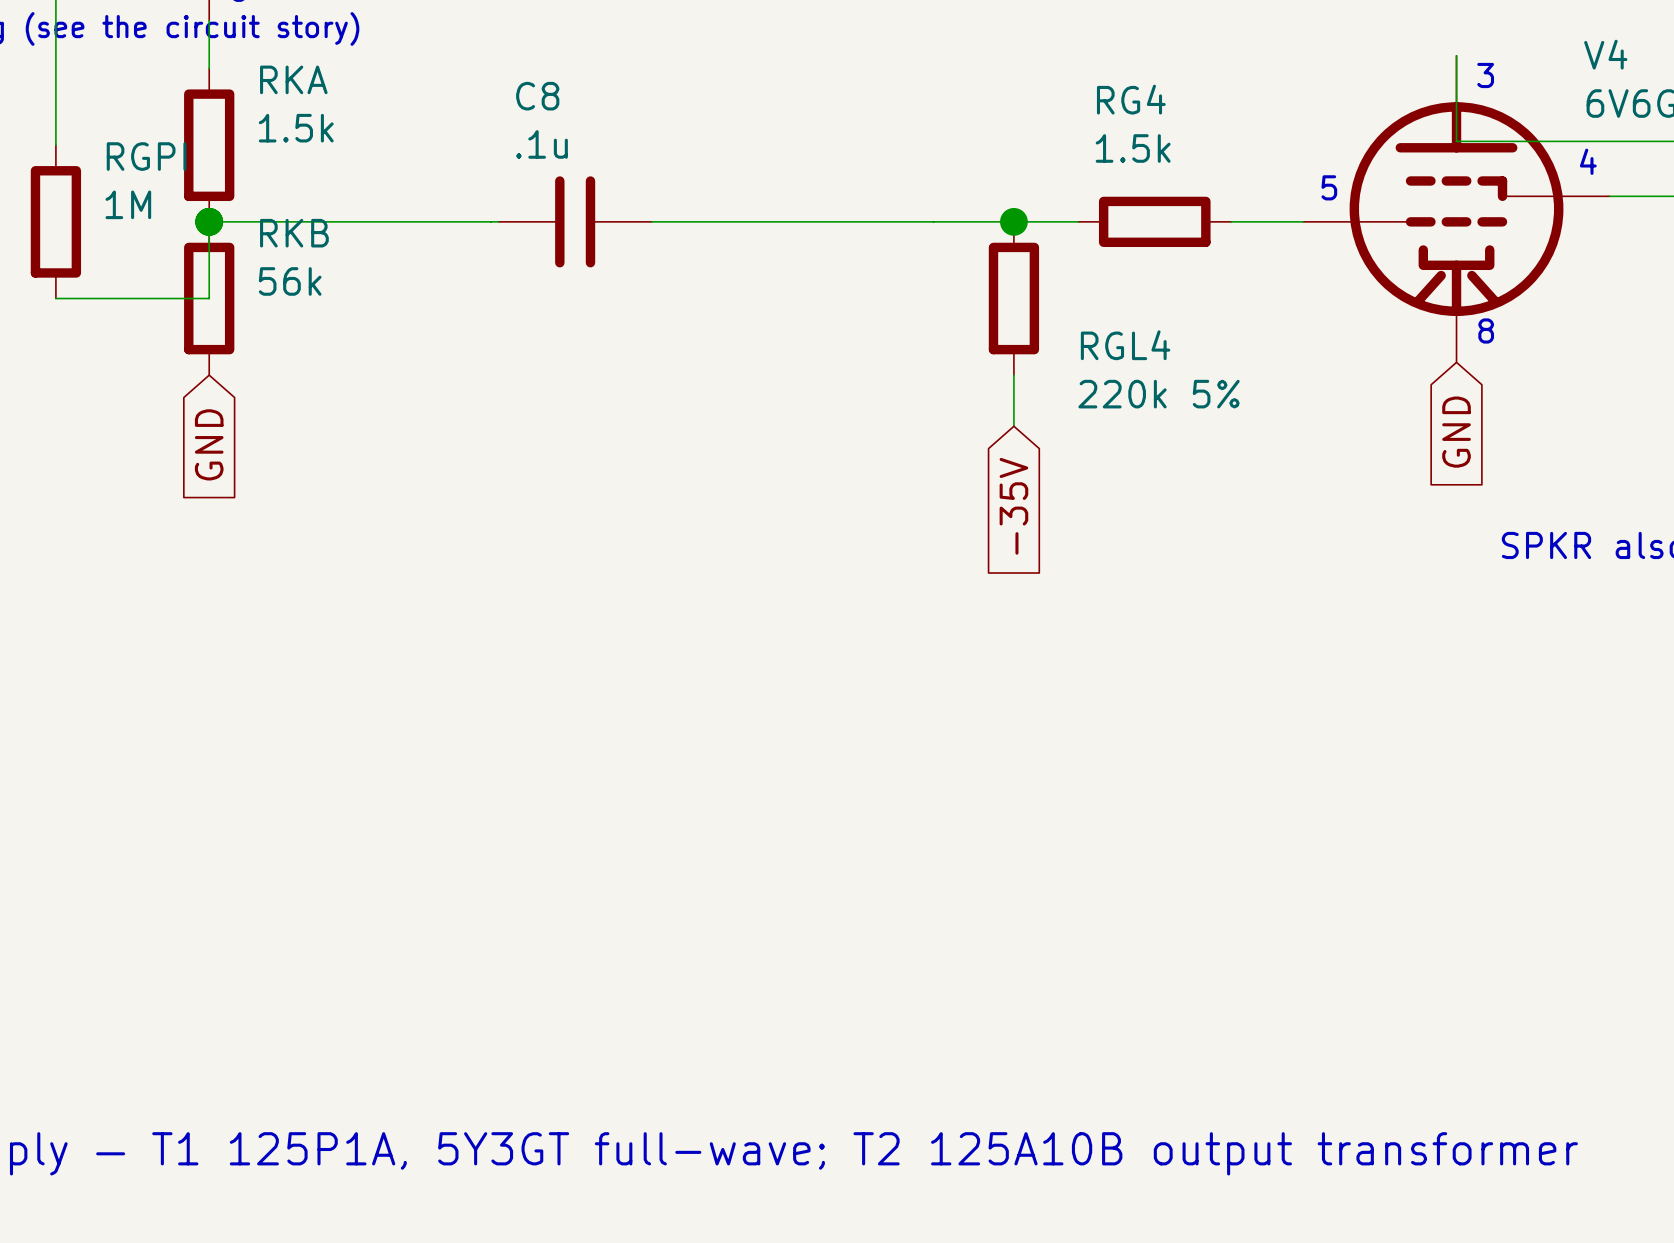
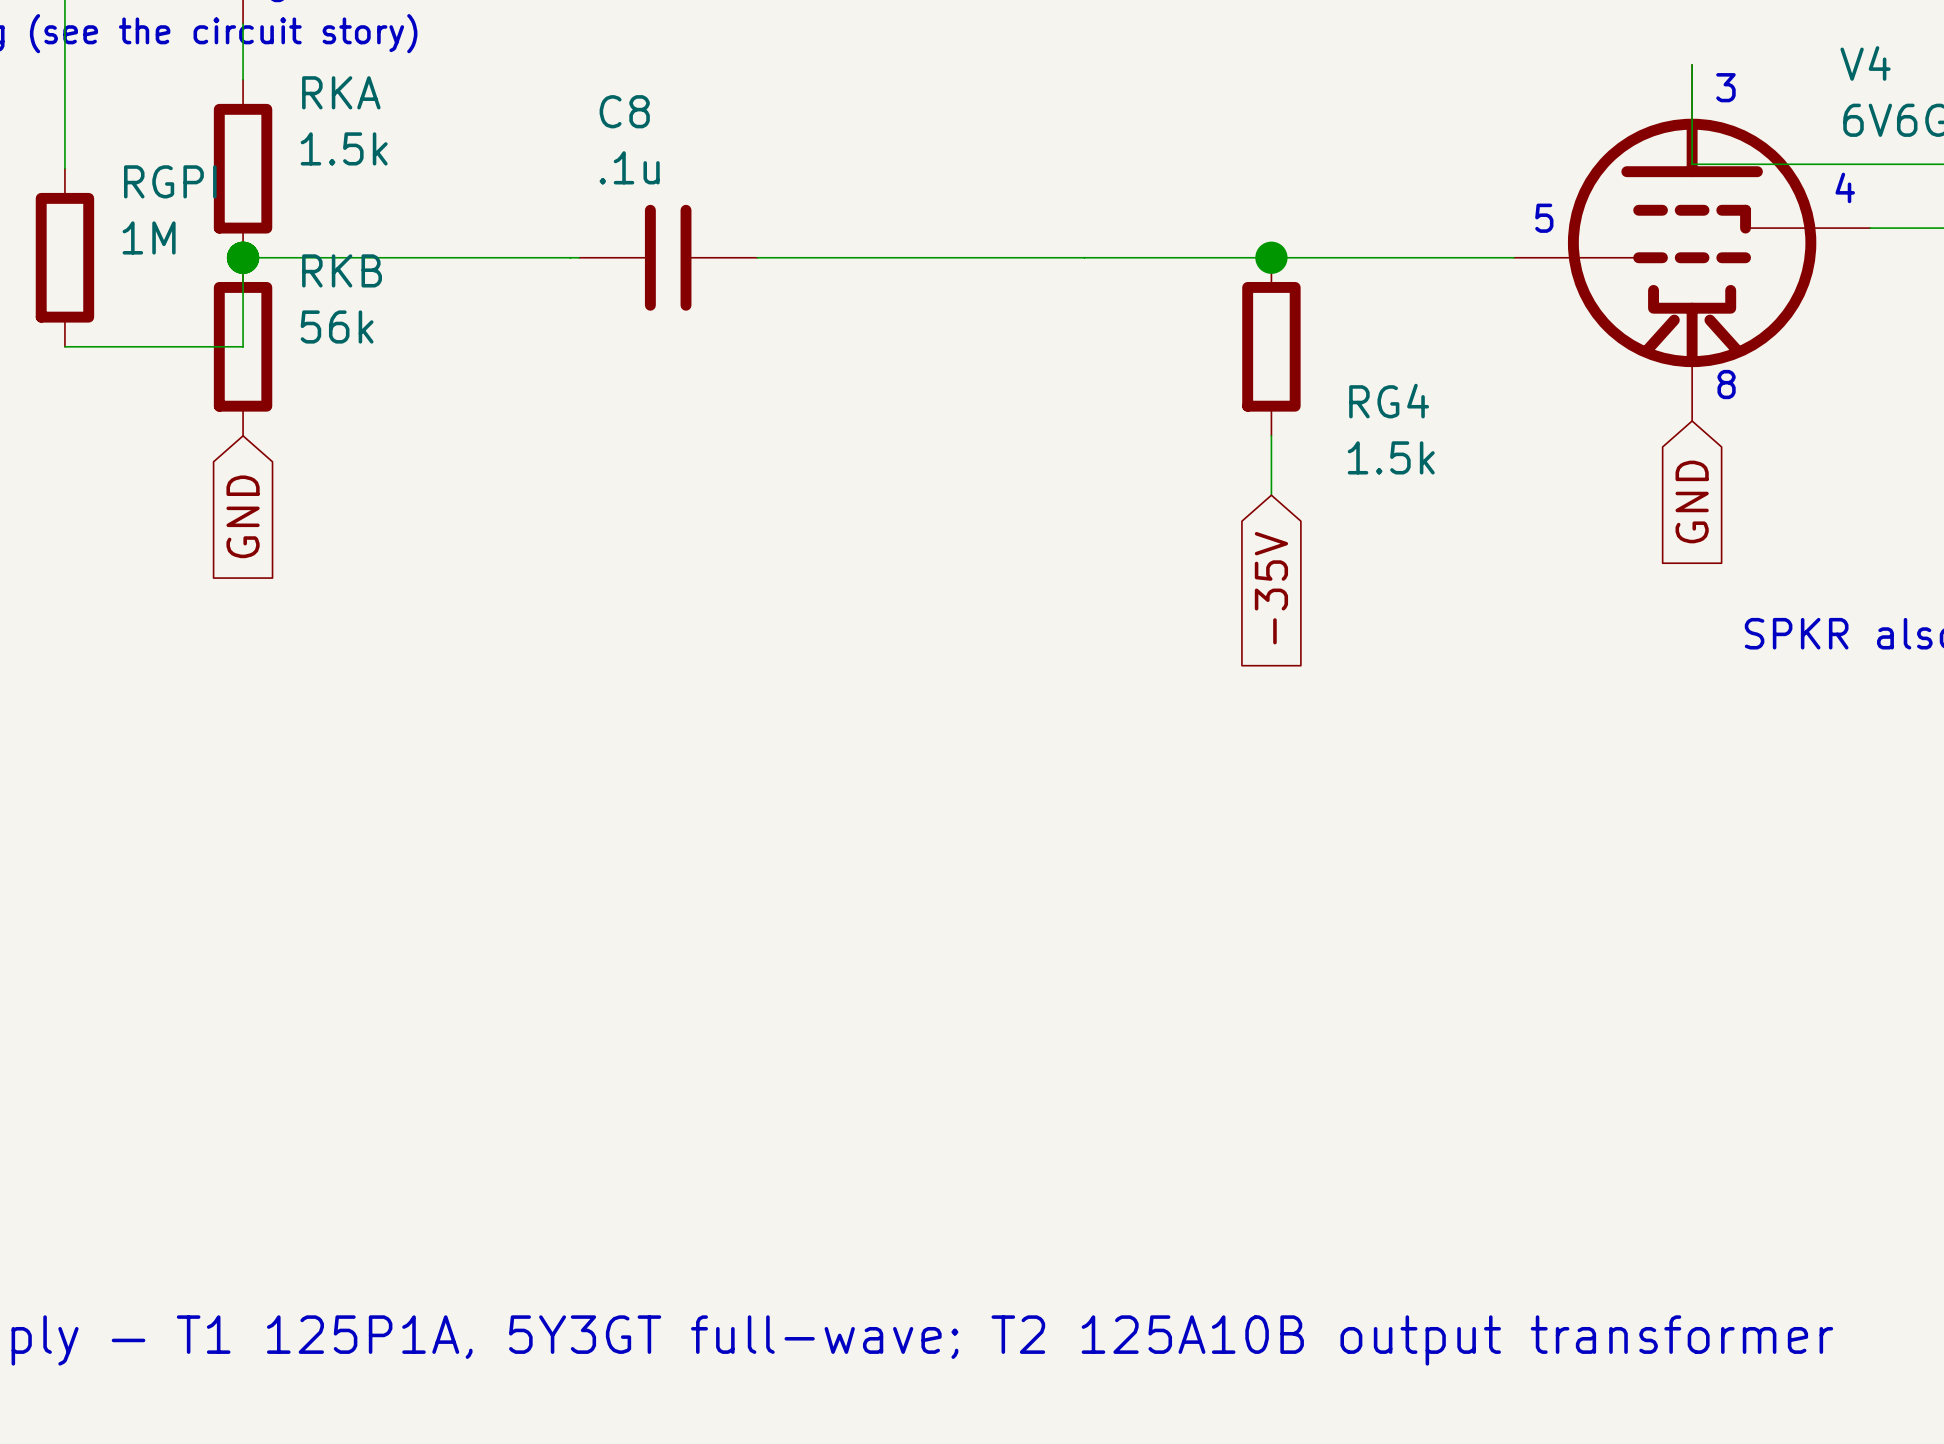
RG4 name position: RG4 (1131, 99) -> RG4 (1389, 401)
RG4 value position: 1.5k (1133, 148) -> 1.5k (1391, 457)
junction position: (1013, 221) -> (1271, 257)
wire: none -> (1252, 257) (1430, 257)
RG4 rotation: 0° (1154, 221) -> 90° clockwise (1271, 346)
RG4 position: (1154, 221) -> (1271, 346)
RGL4: 220k 5% (1013, 298) -> none
wire: (1013, 375) (1013, 426) -> (1271, 435) (1271, 495)
global label position: -35V (1013, 506) -> -35V (1271, 588)

